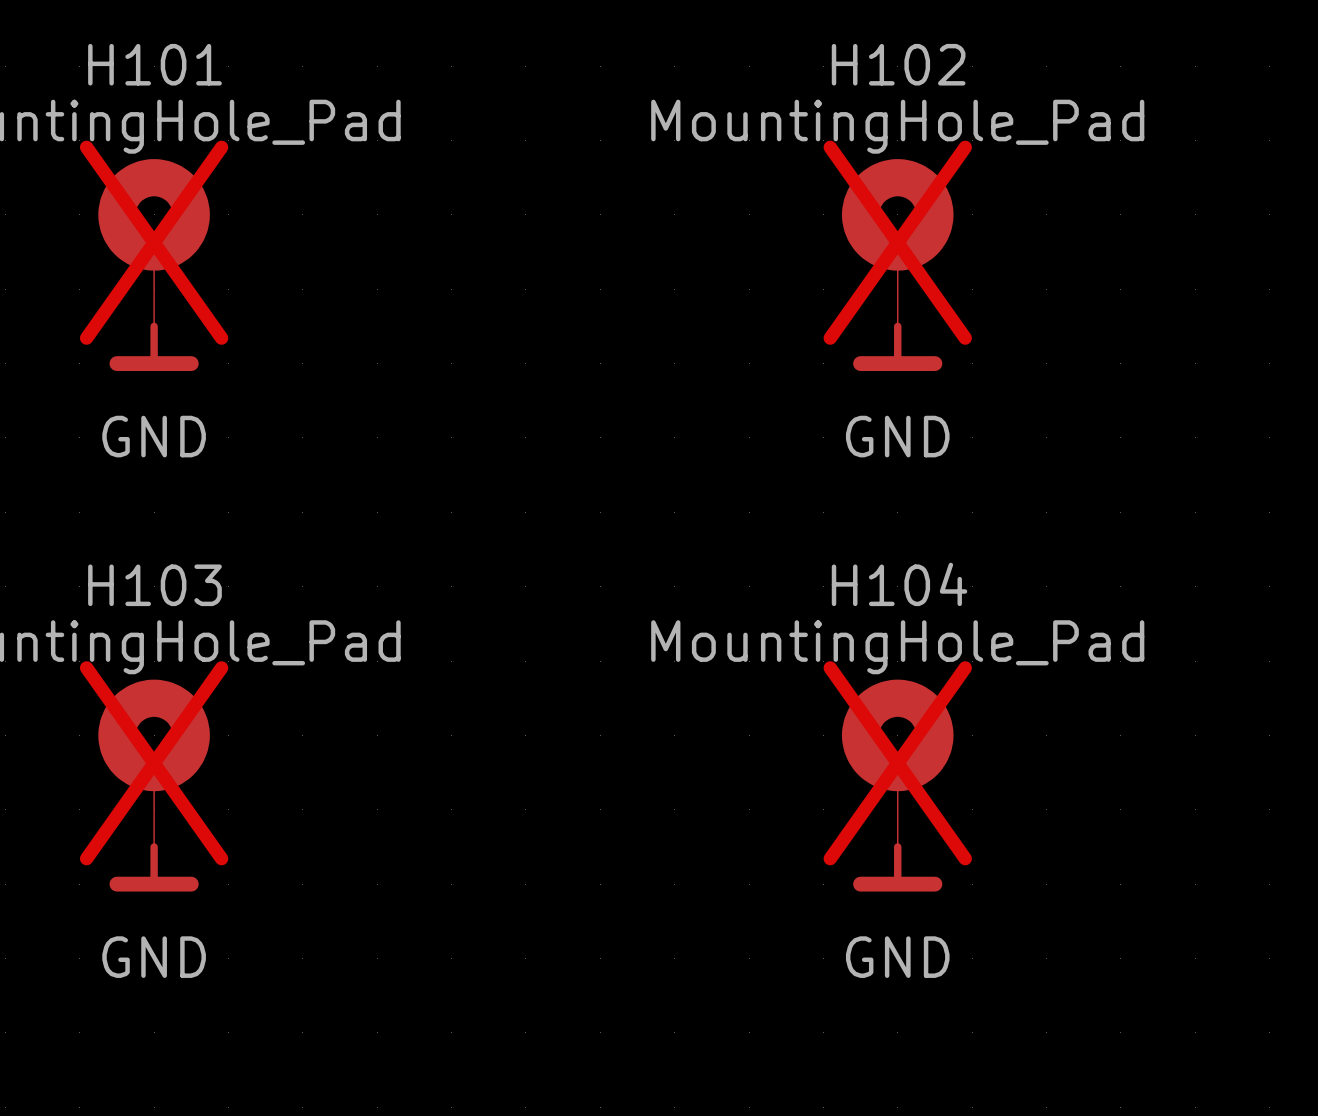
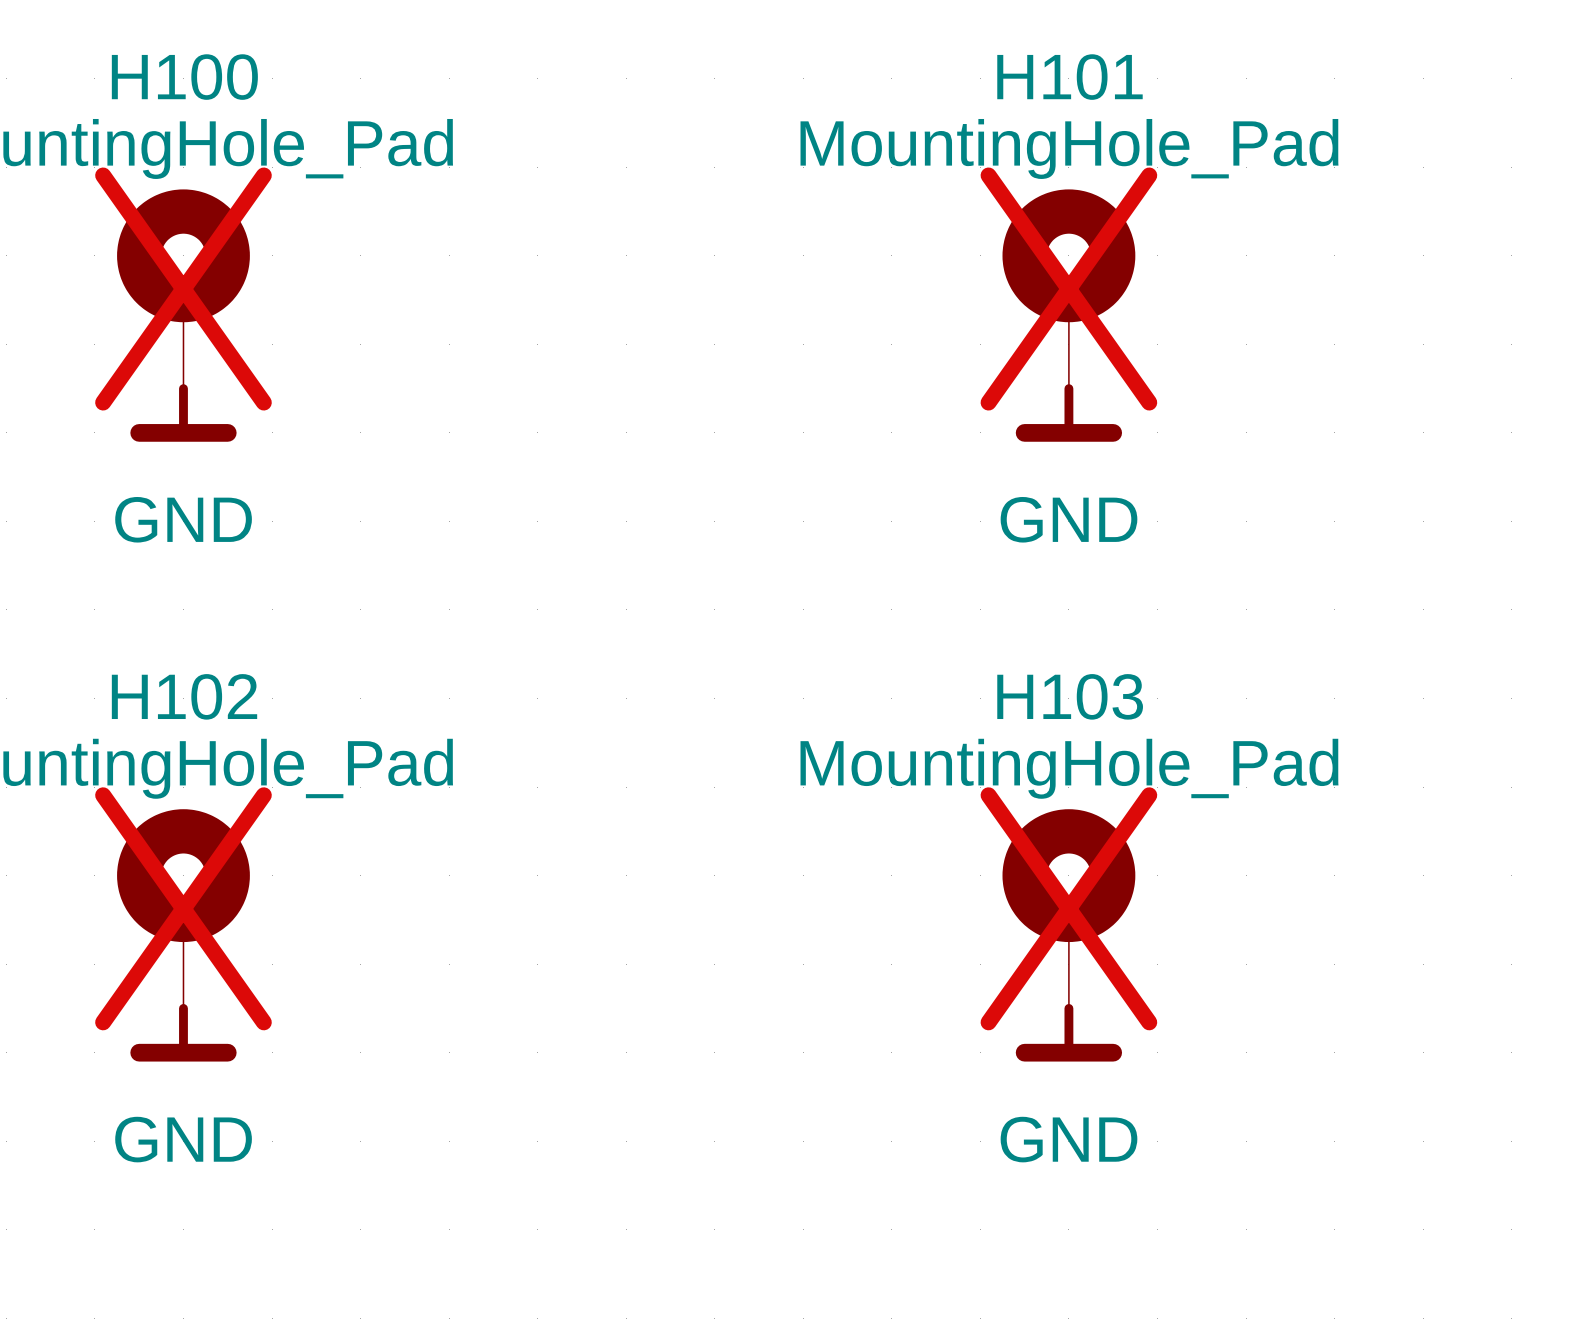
H101 name: H101 (154, 64) -> H100 (184, 77)
H102 name: H102 (898, 64) -> H101 (1069, 77)
H104 name: H104 (899, 584) -> H103 (1070, 696)
H103 name: H103 (154, 585) -> H102 (184, 696)

